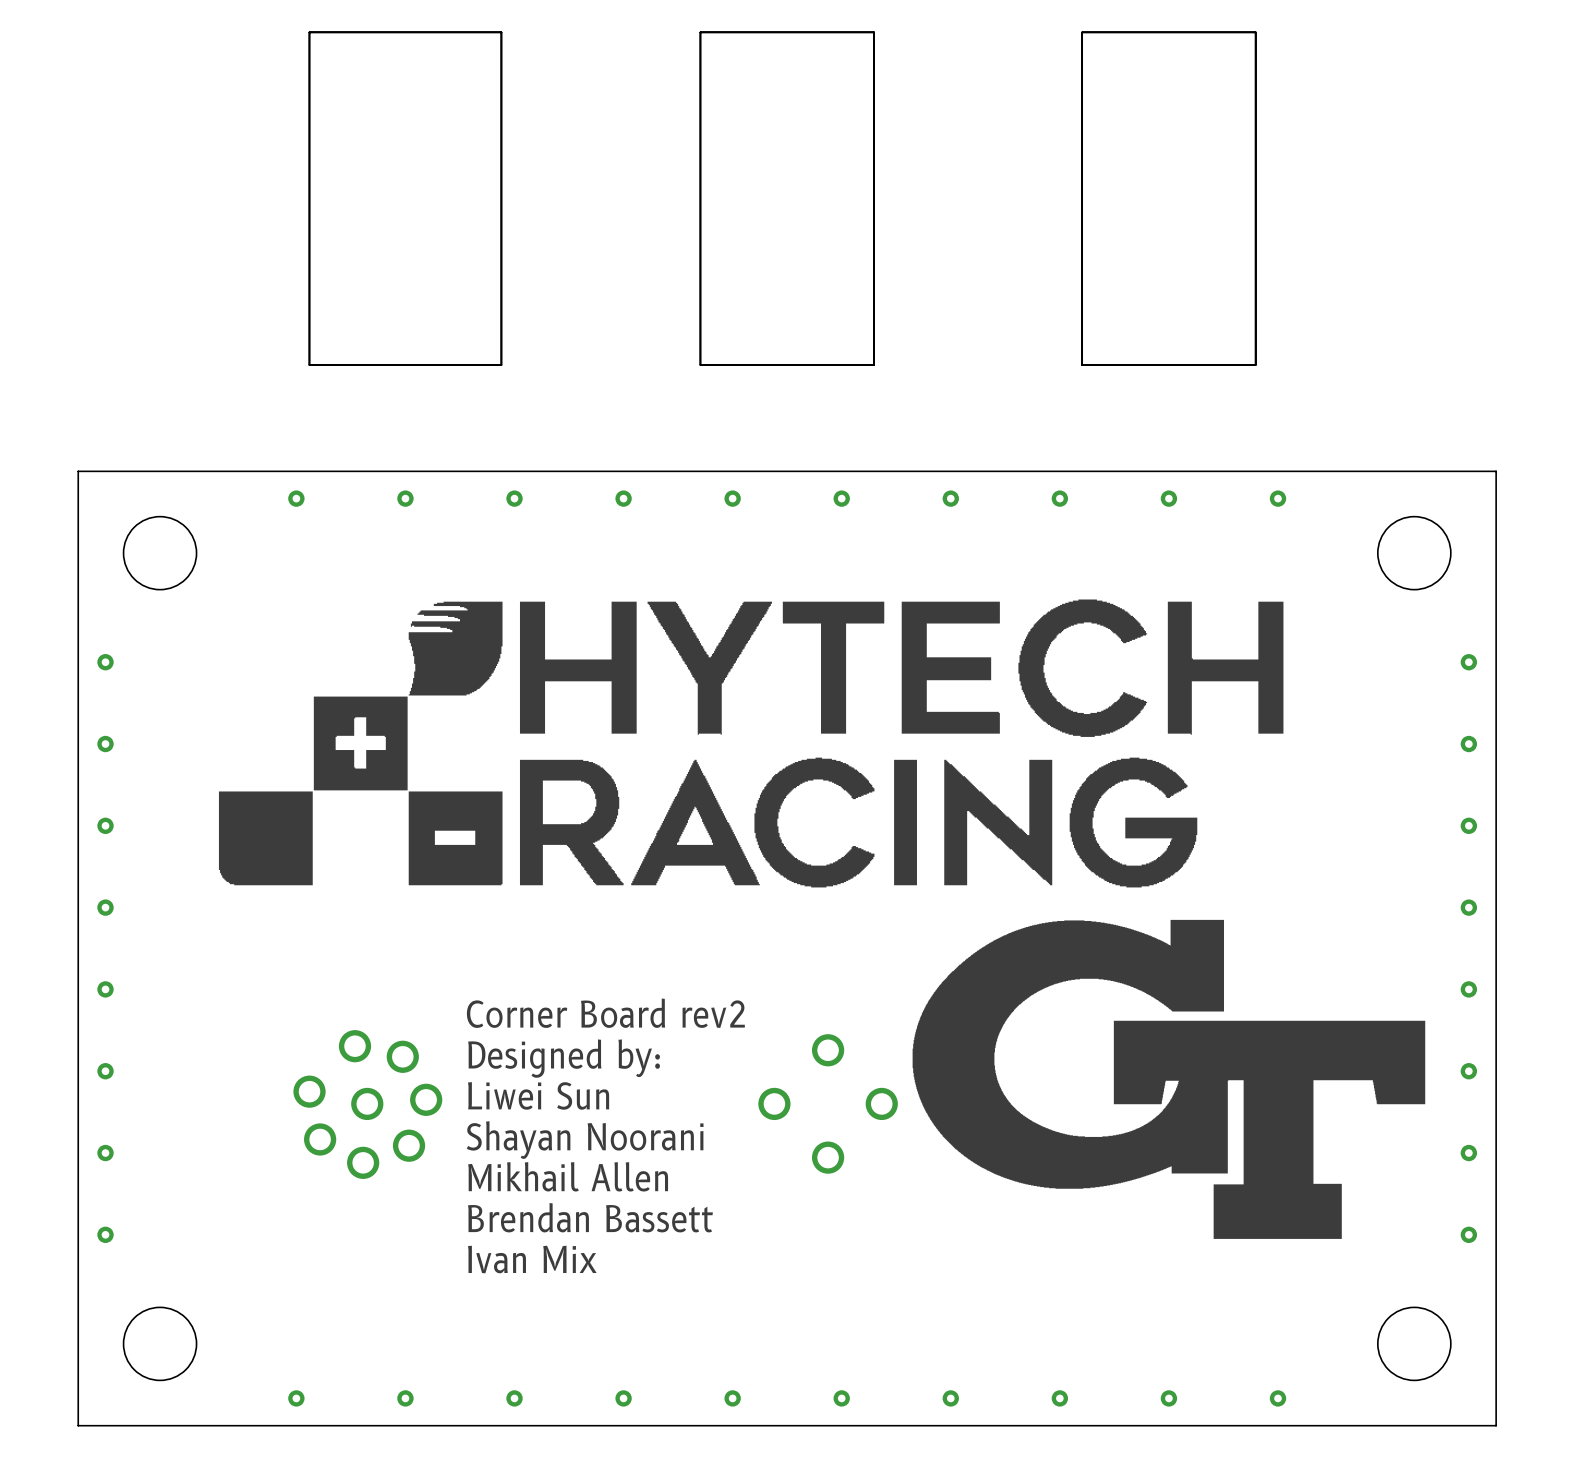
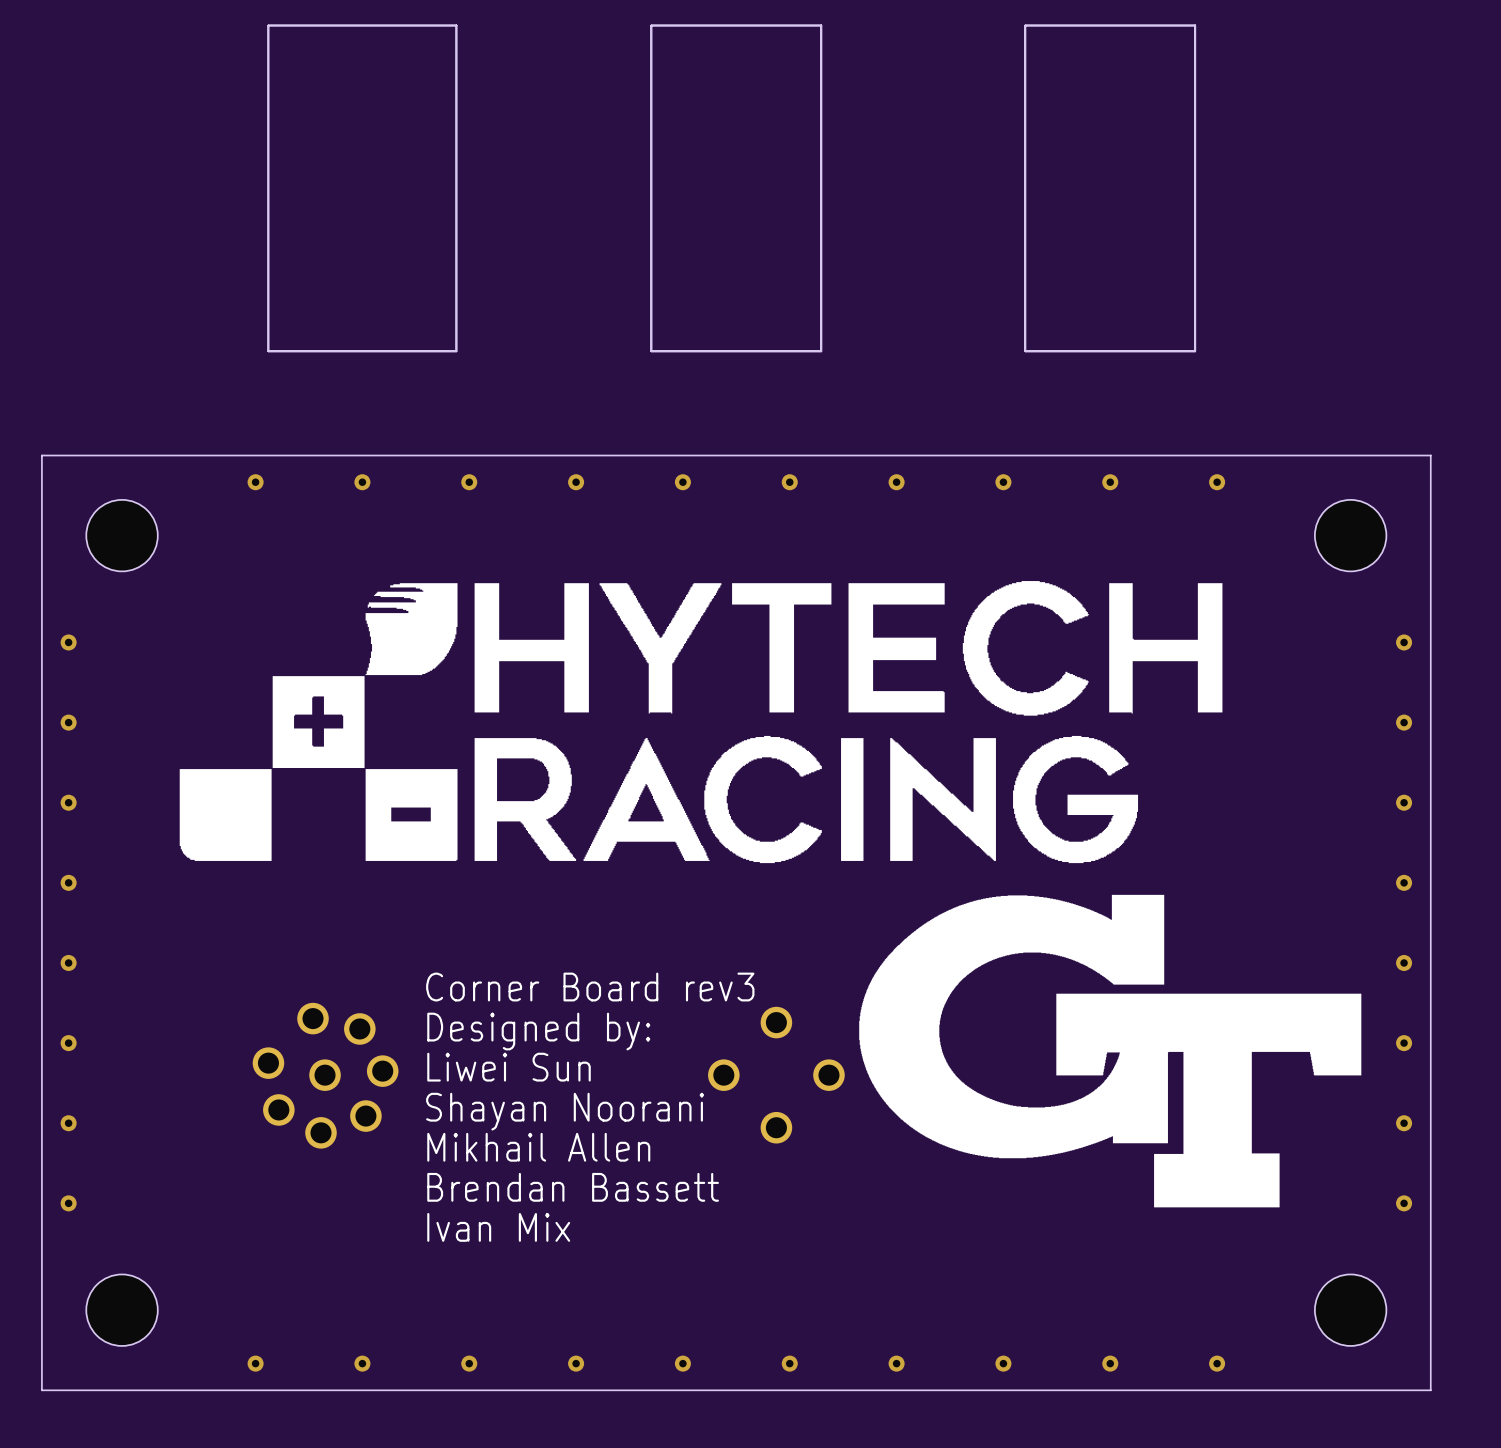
text: Corner Board rev2 (605, 1013) -> Corner Board rev3 (590, 987)

